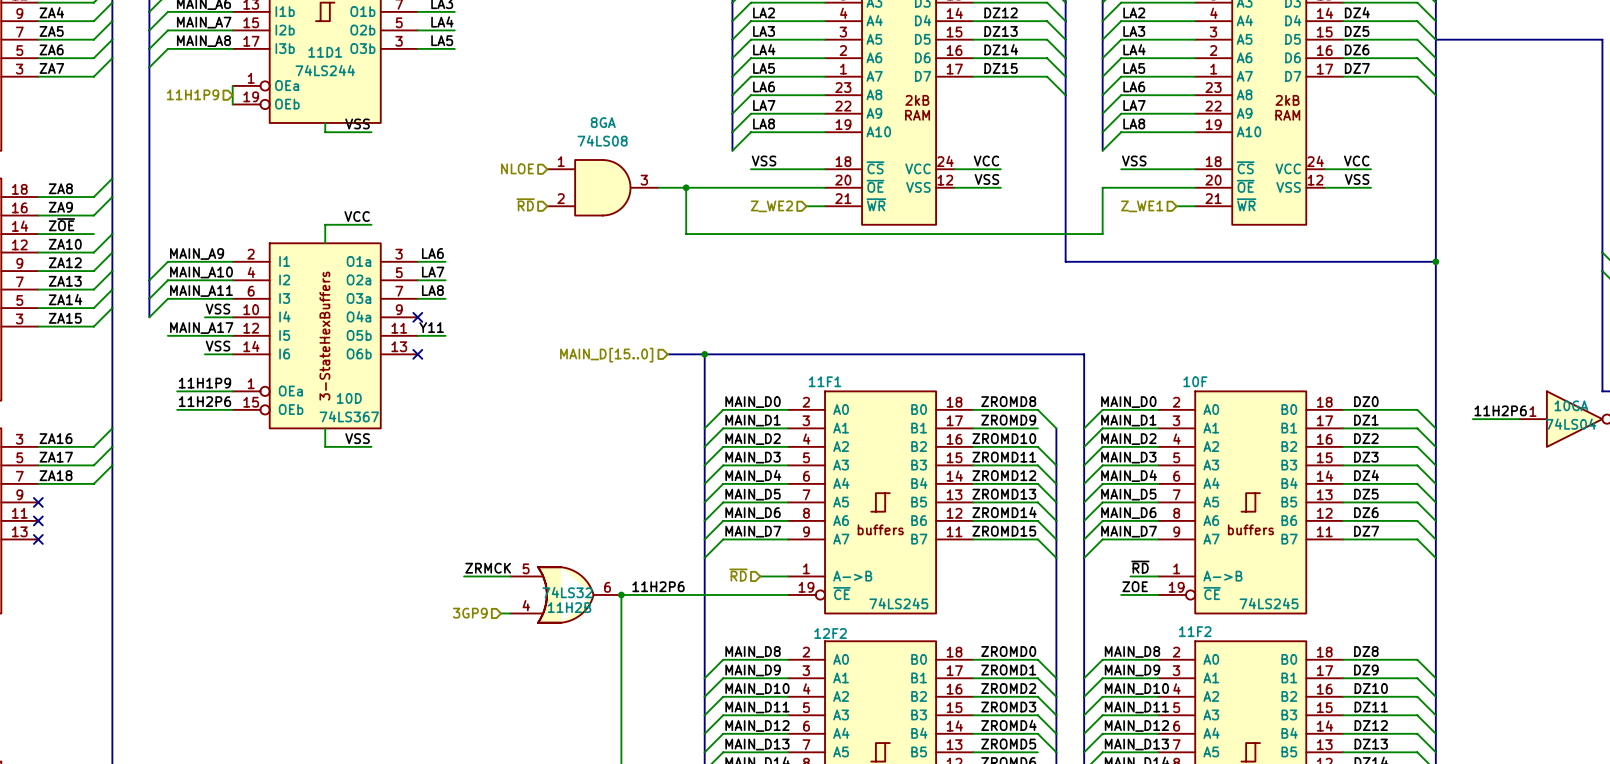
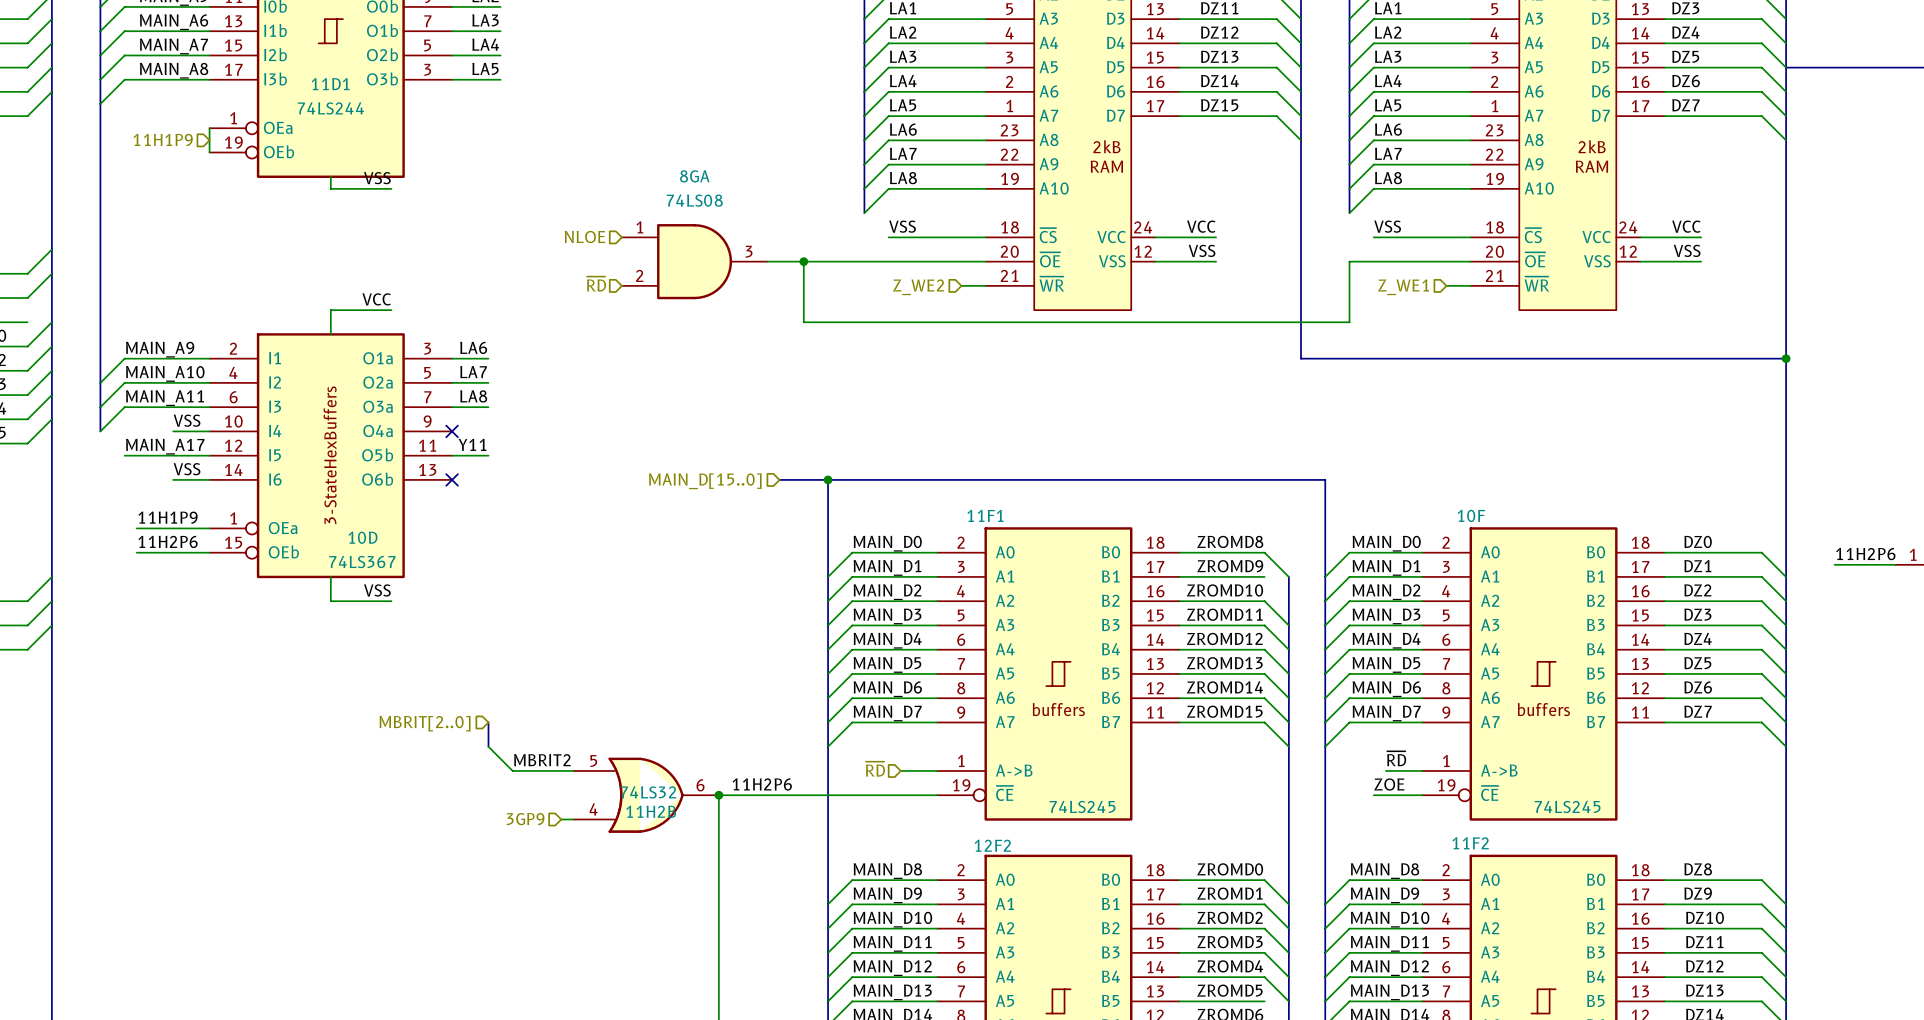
bus: none -> (488, 722) (488, 746)
hierarchical label: none -> MBRIT[2..0] (425, 723)
wire: none -> (488, 746) (512, 770)
label: ZRMCK (488, 568) -> MBRIT2 (542, 760)

